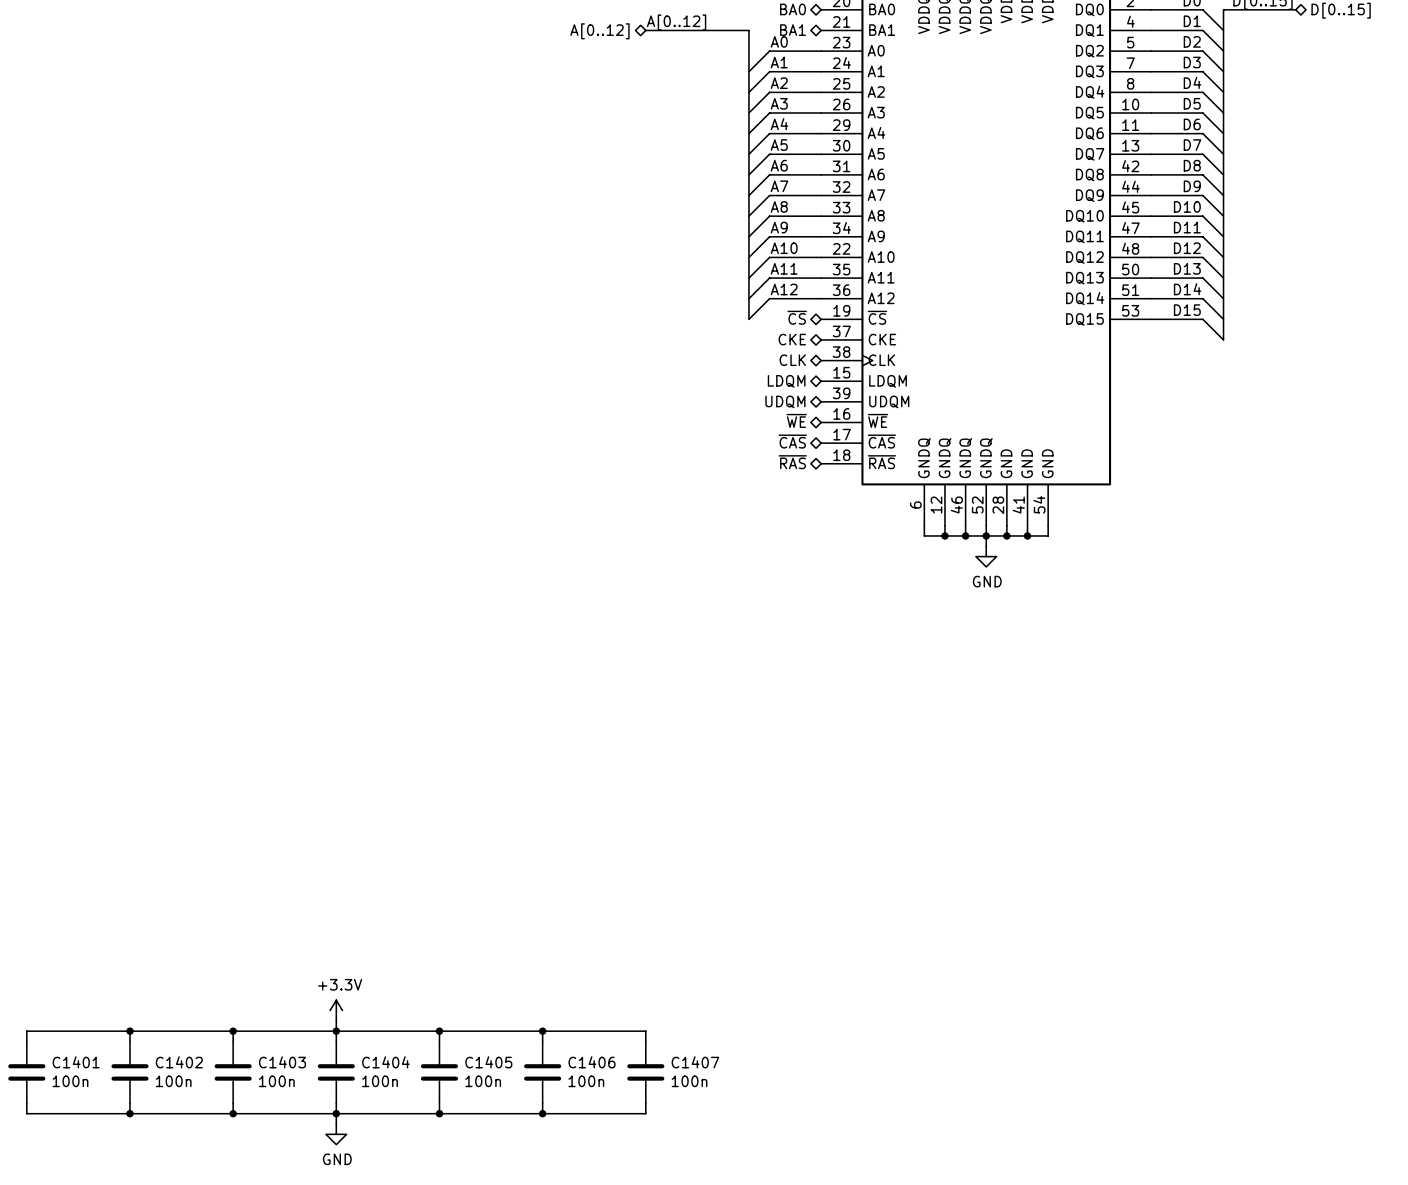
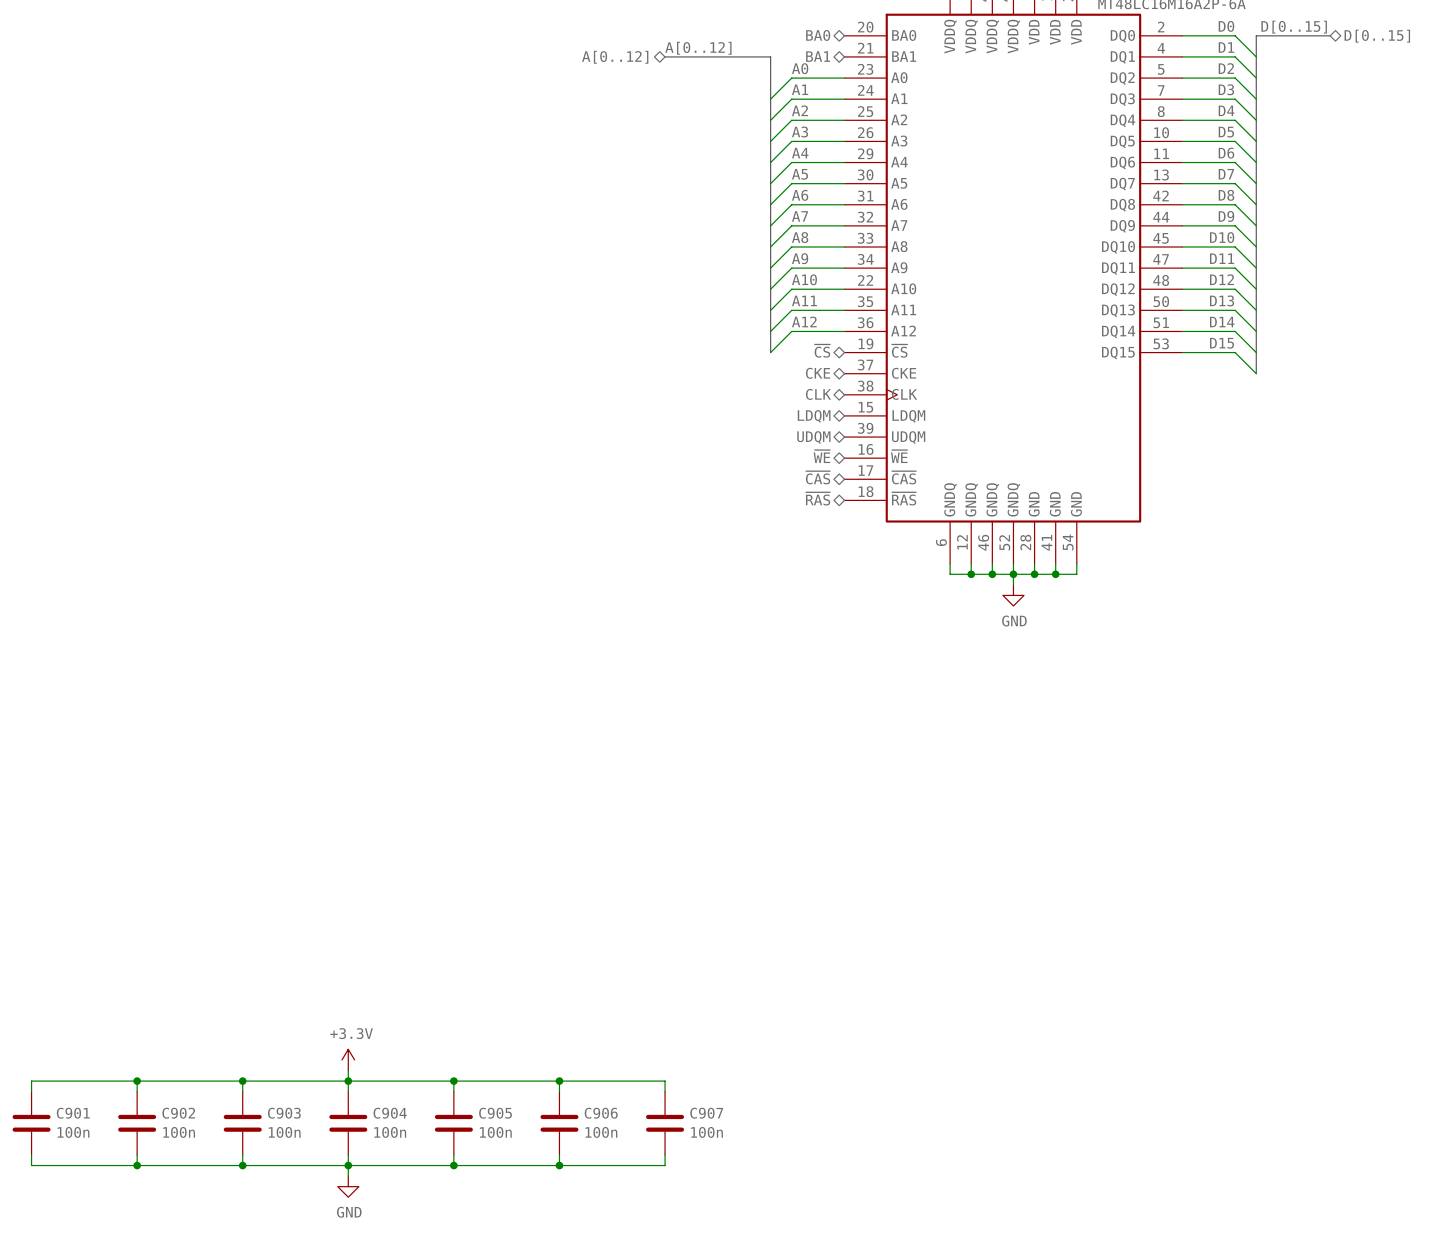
C1401 name: C1401 (76, 1062) -> C901 (73, 1113)
C1402 name: C1402 (179, 1062) -> C902 (178, 1113)
C1403 name: C1403 (282, 1062) -> C903 (284, 1113)
C1404 name: C1404 (385, 1062) -> C904 (390, 1113)
C1405 name: C1405 (488, 1062) -> C905 (495, 1113)
C1406 name: C1406 (591, 1062) -> C906 (601, 1113)
C1407 name: C1407 (695, 1062) -> C907 (706, 1113)

